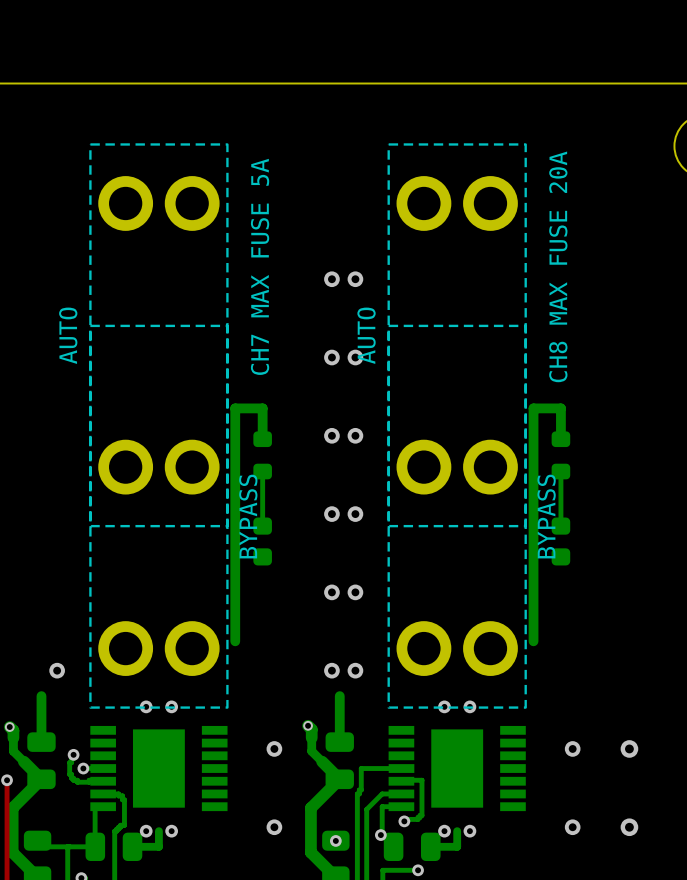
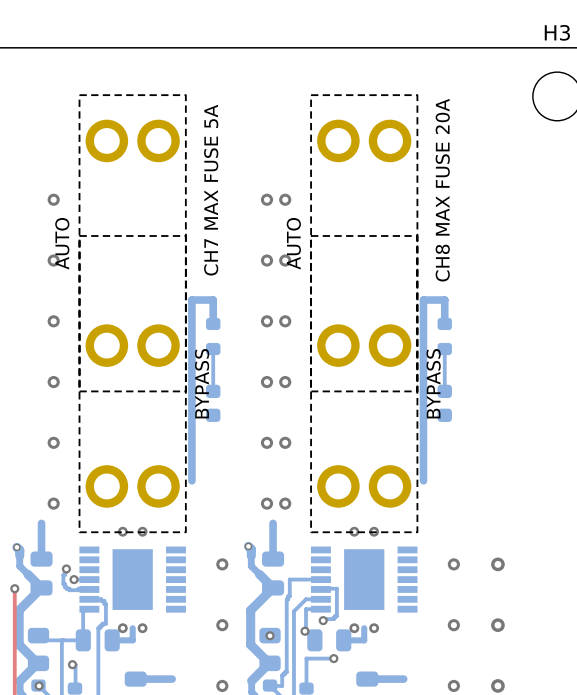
via: none -> (53, 199)
via: none -> (53, 260)
via: none -> (53, 321)
via: none -> (53, 382)
via: none -> (53, 442)

